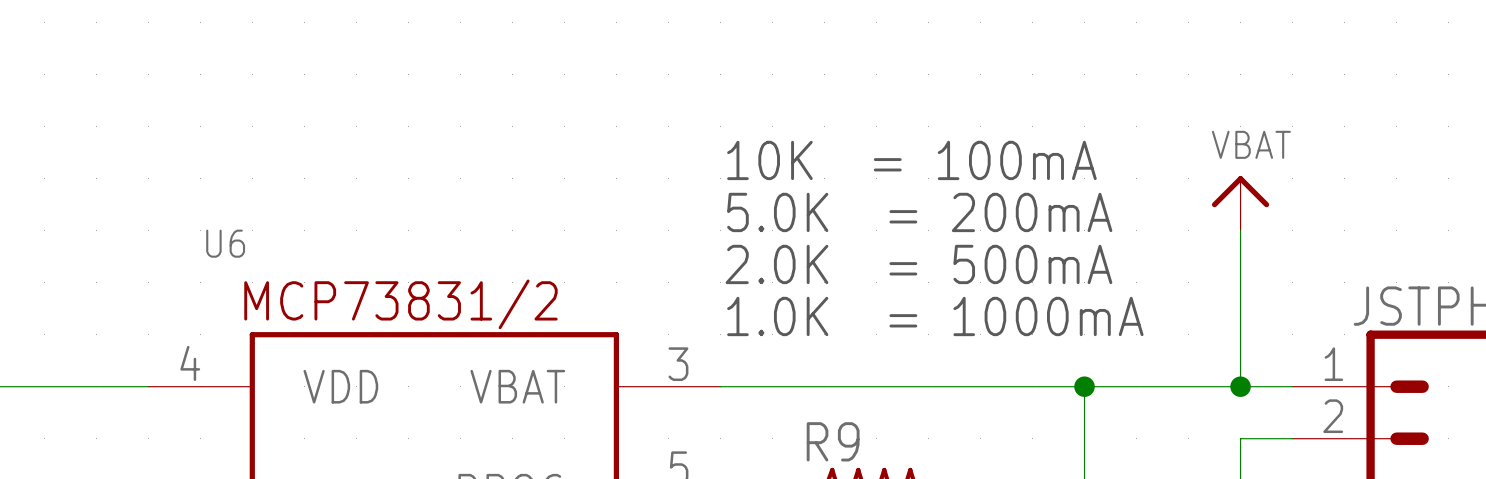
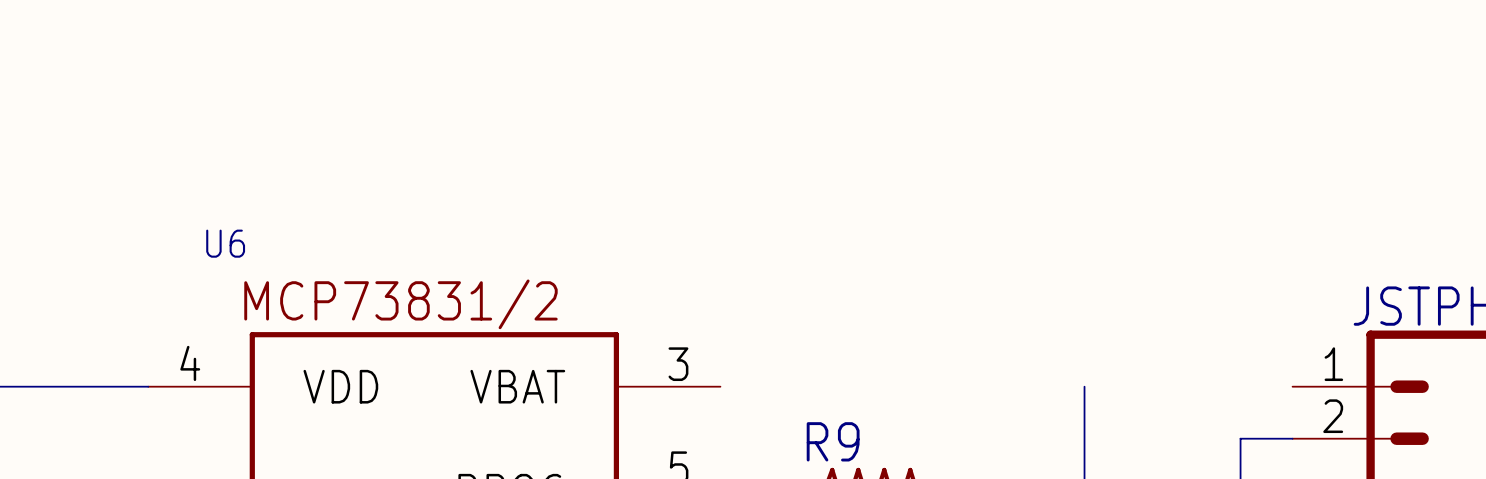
text: 10K = 100mA (911, 160) -> none
power symbol: VBAT (1240, 203) -> none
text: 5.0K = 200mA (919, 212) -> none
wire: (1240, 230) (1240, 386) -> none
text: 2.0K = 500mA (918, 264) -> none
text: 1.0K = 1000mA (935, 316) -> none
wire: (720, 386) (1292, 386) -> none
junction: (1084, 386) -> none
junction: (1240, 386) -> none

